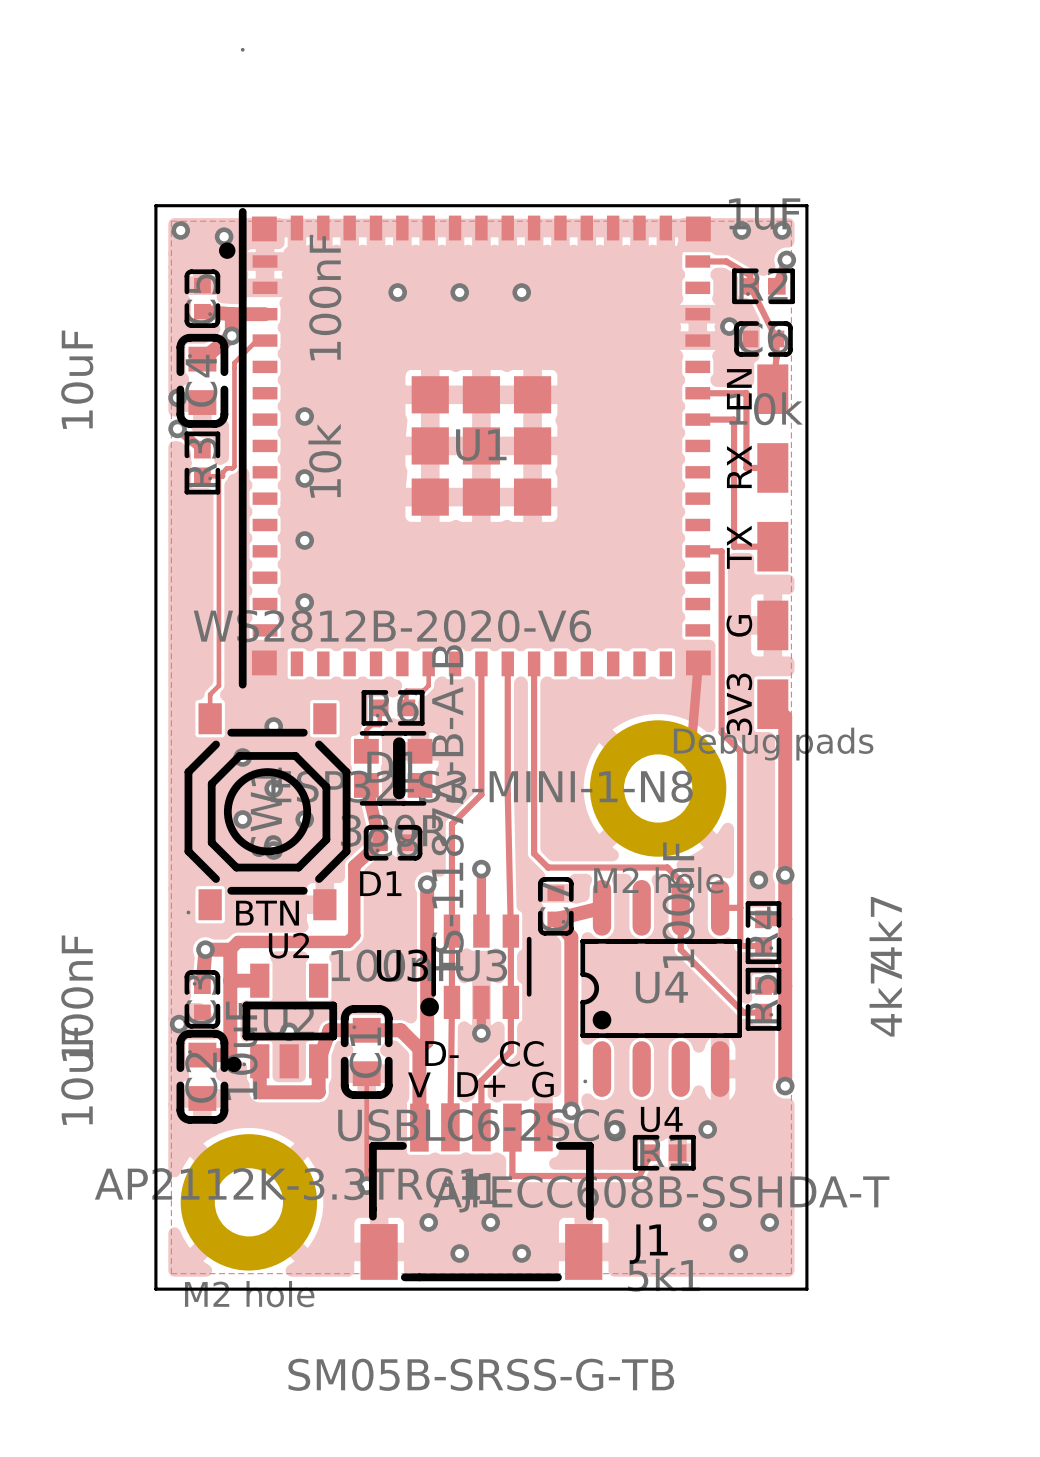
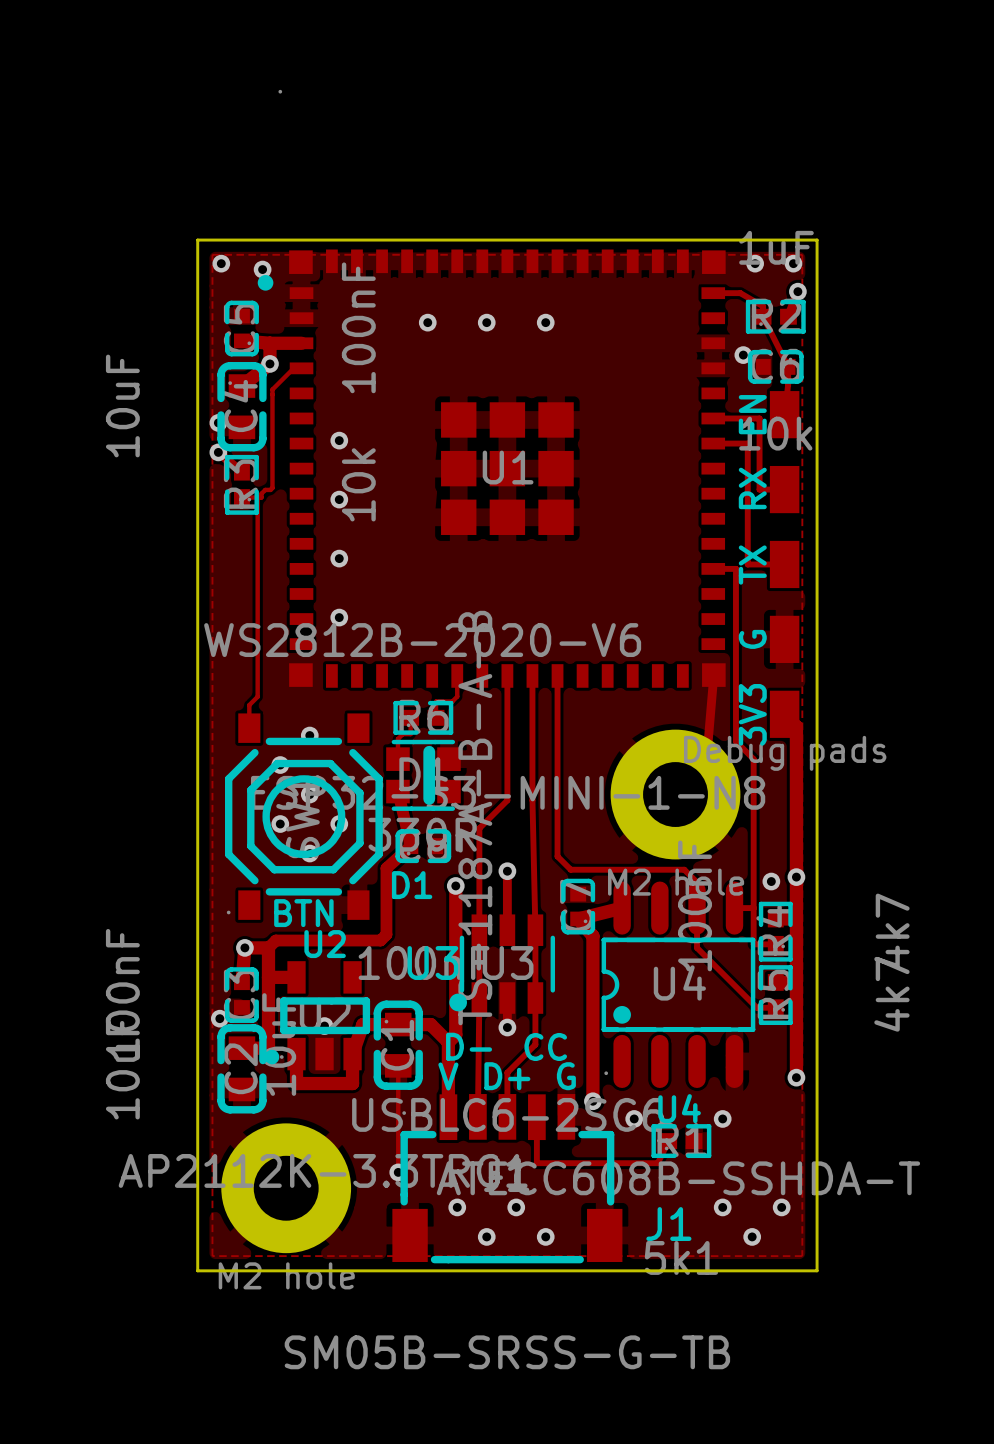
U1 footprint: [218, 47, 711, 689] -> [257, 89, 726, 688]

